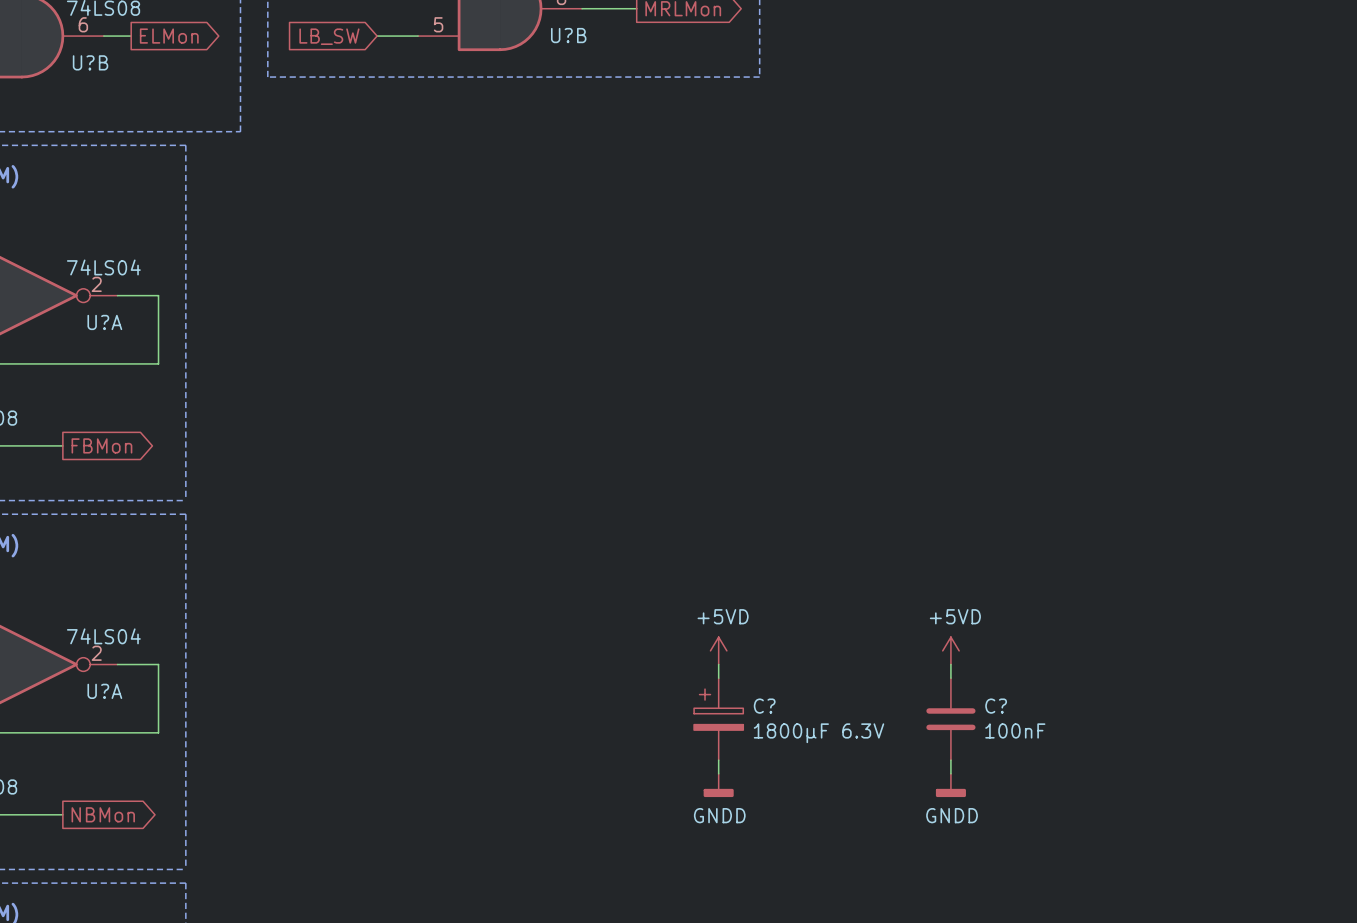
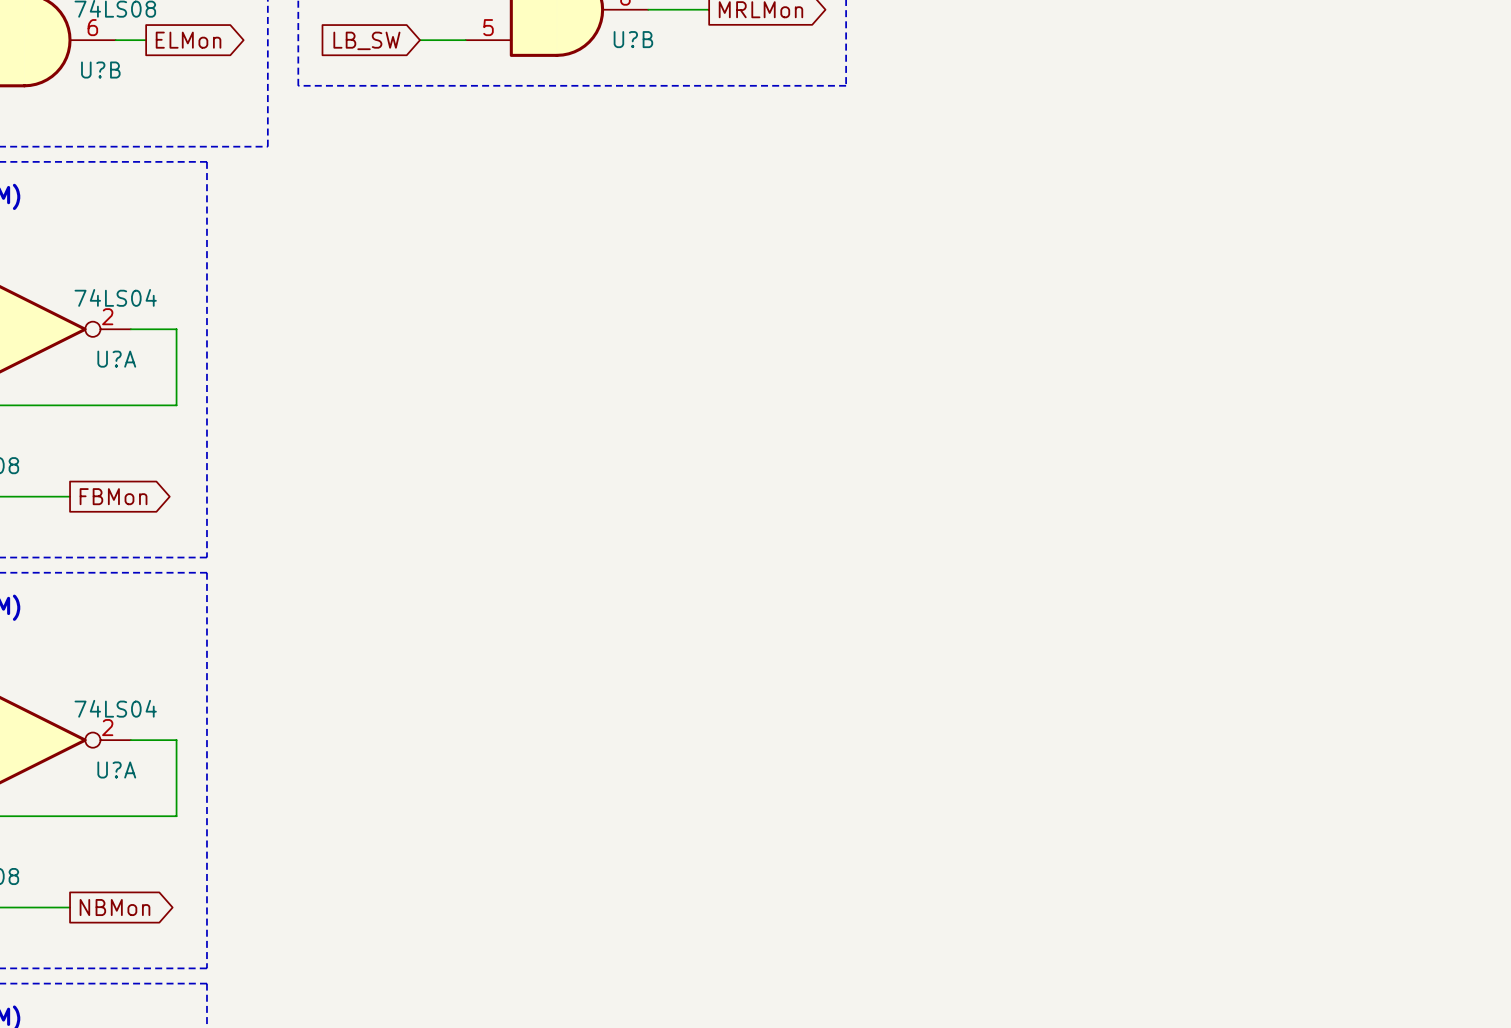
power symbol: +5VD (718, 650) -> none
power symbol: +5VD (950, 650) -> none
wire: (718, 664) (718, 678) -> none
wire: (950, 664) (950, 678) -> none
C?: 1800µF 6.3V (718, 719) -> none
C?: 100nF (950, 719) -> none
wire: (718, 760) (718, 773) -> none
wire: (950, 760) (950, 773) -> none
power symbol: GNDD (718, 785) -> none
power symbol: GNDD (950, 785) -> none

